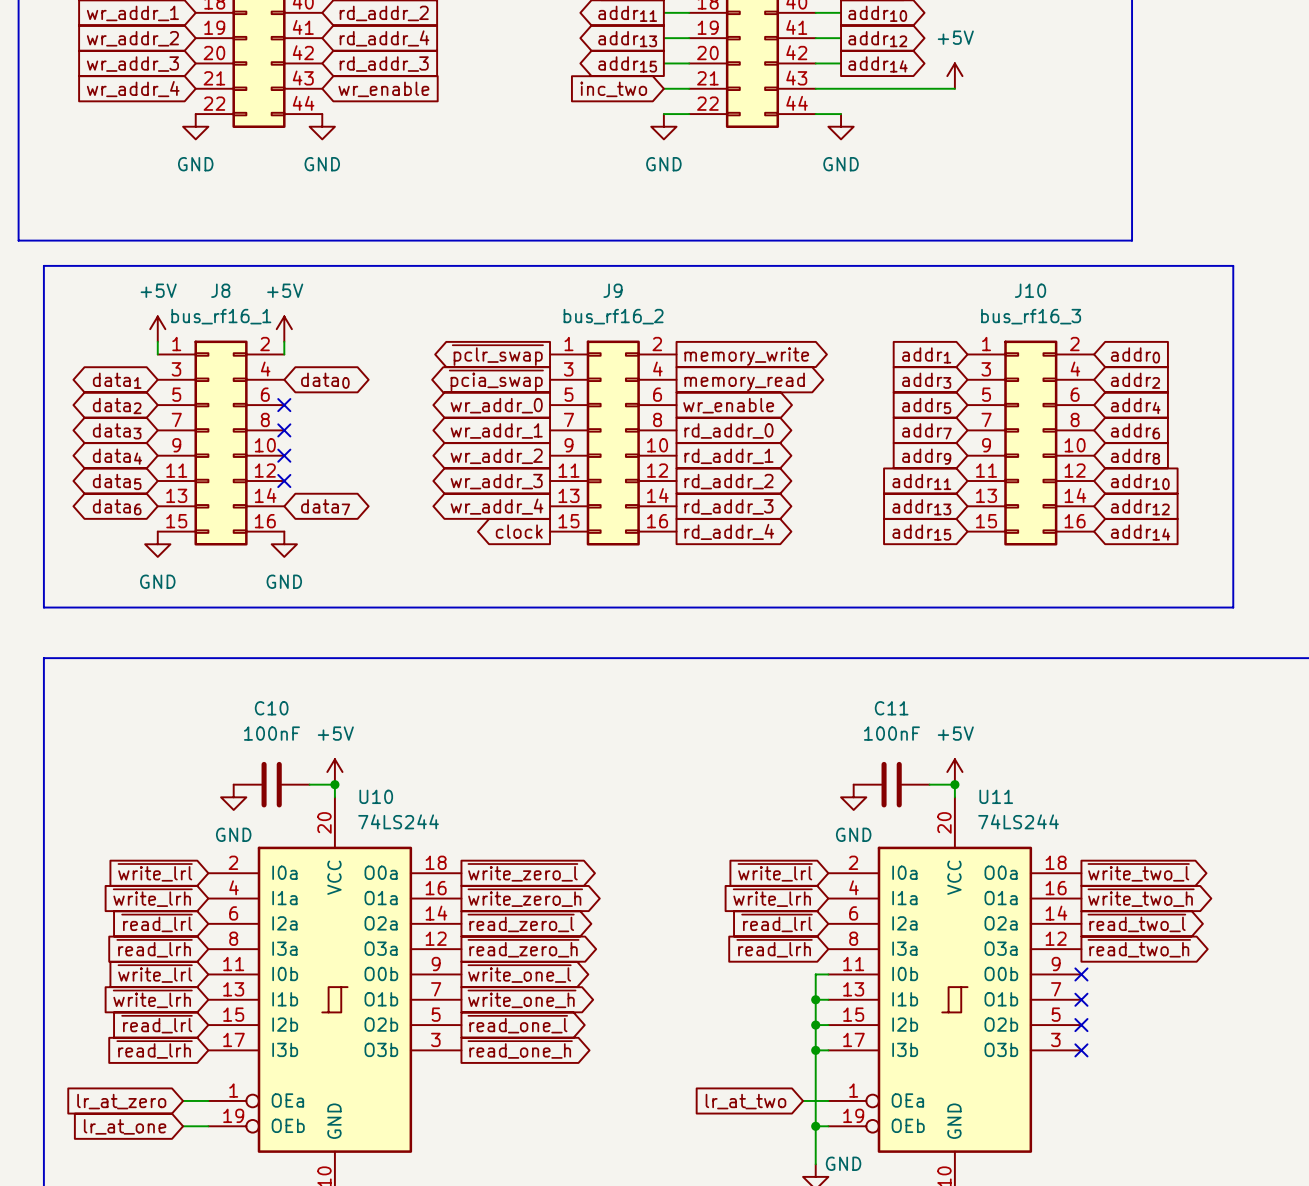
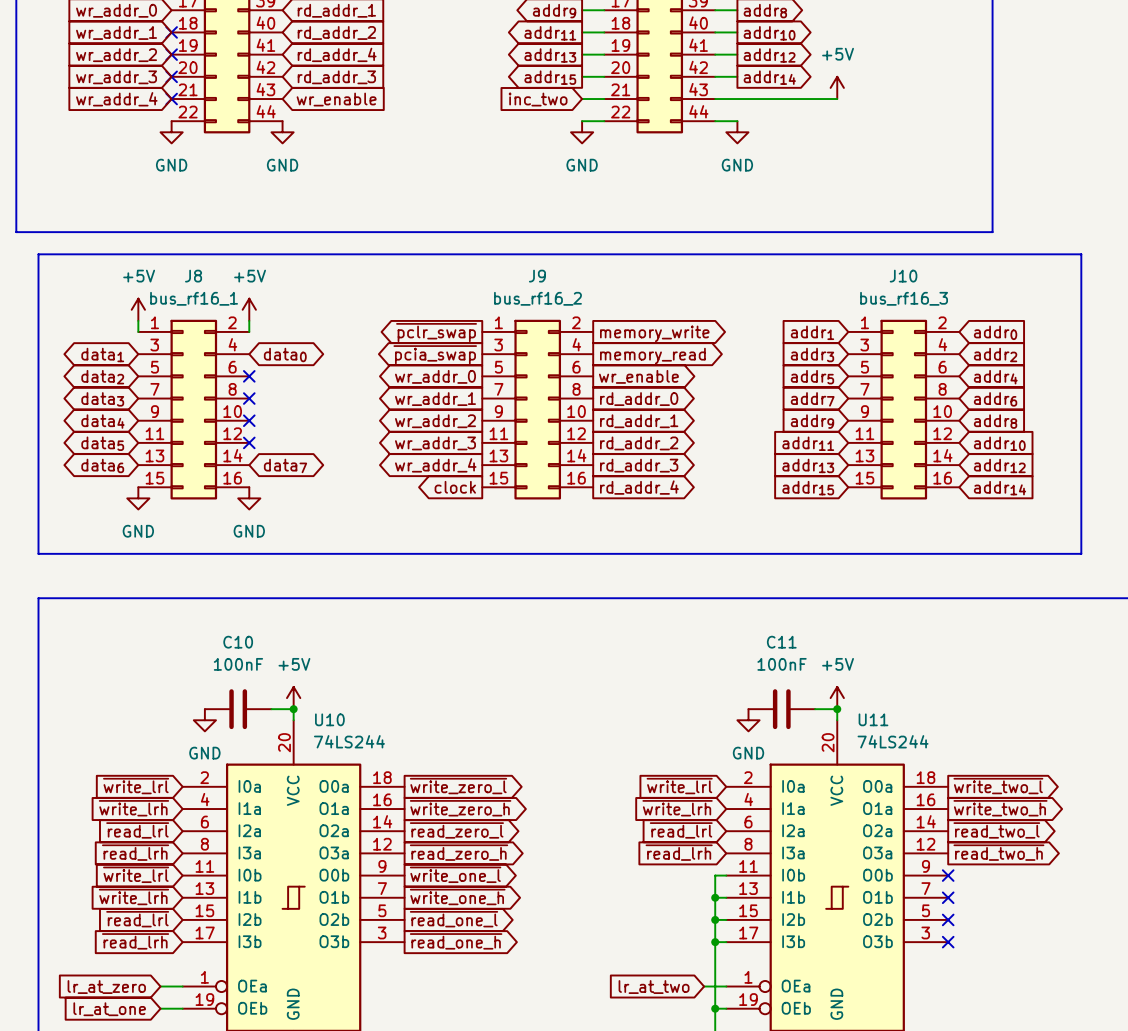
no-connect mark: none -> (171, 32)
no-connect mark: none -> (171, 54)
no-connect mark: none -> (171, 76)
no-connect mark: none -> (171, 99)

